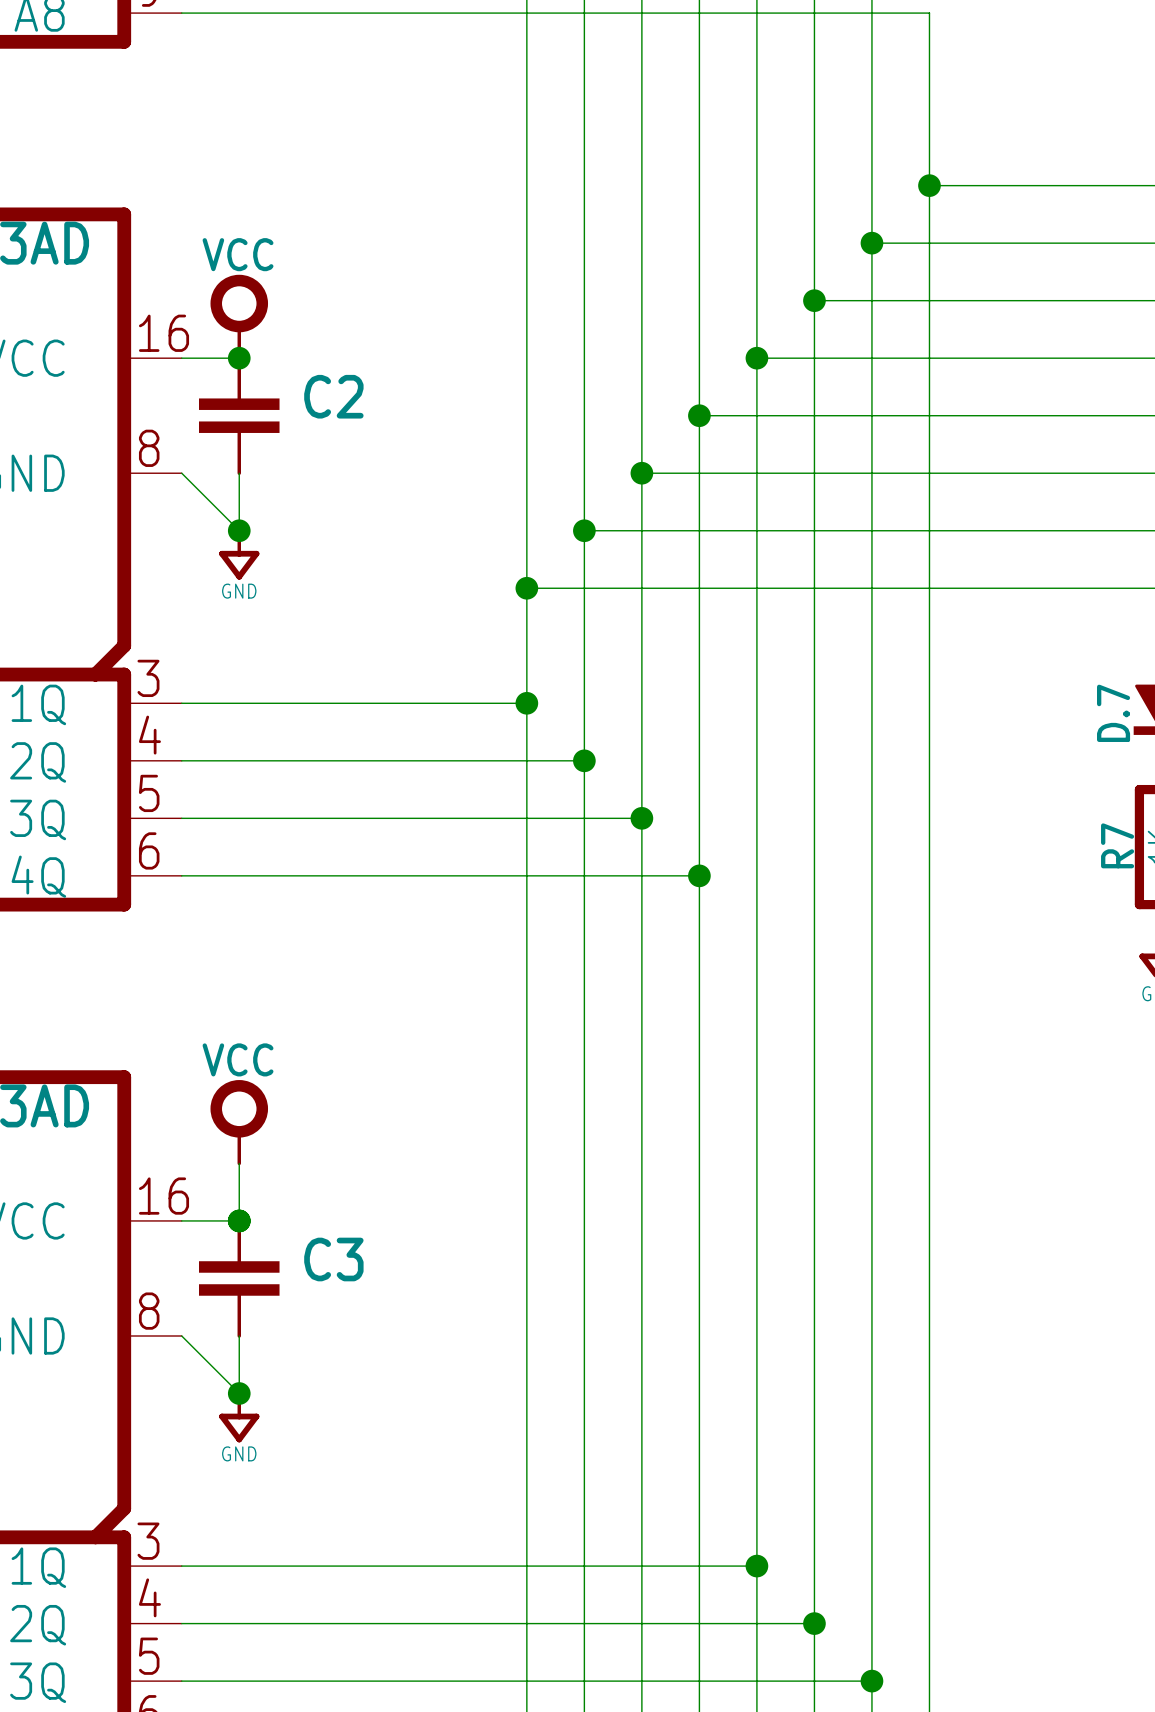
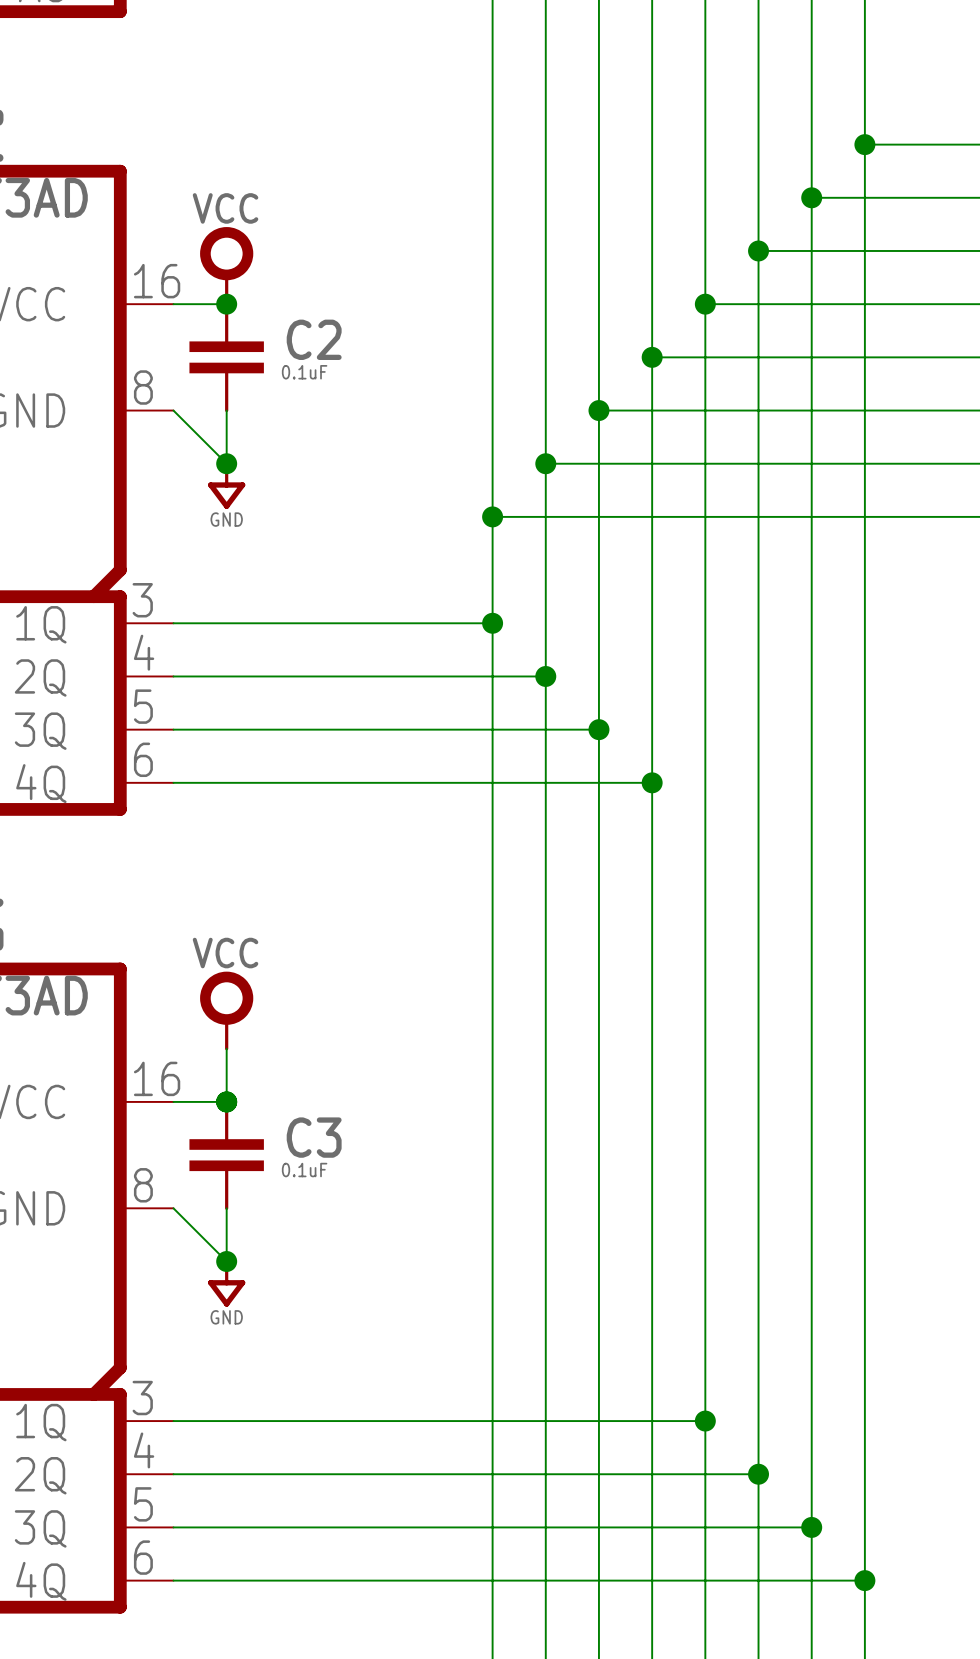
C2 value: none -> 0.1uF (304, 372)
C3 value: none -> 0.1uF (304, 1170)

